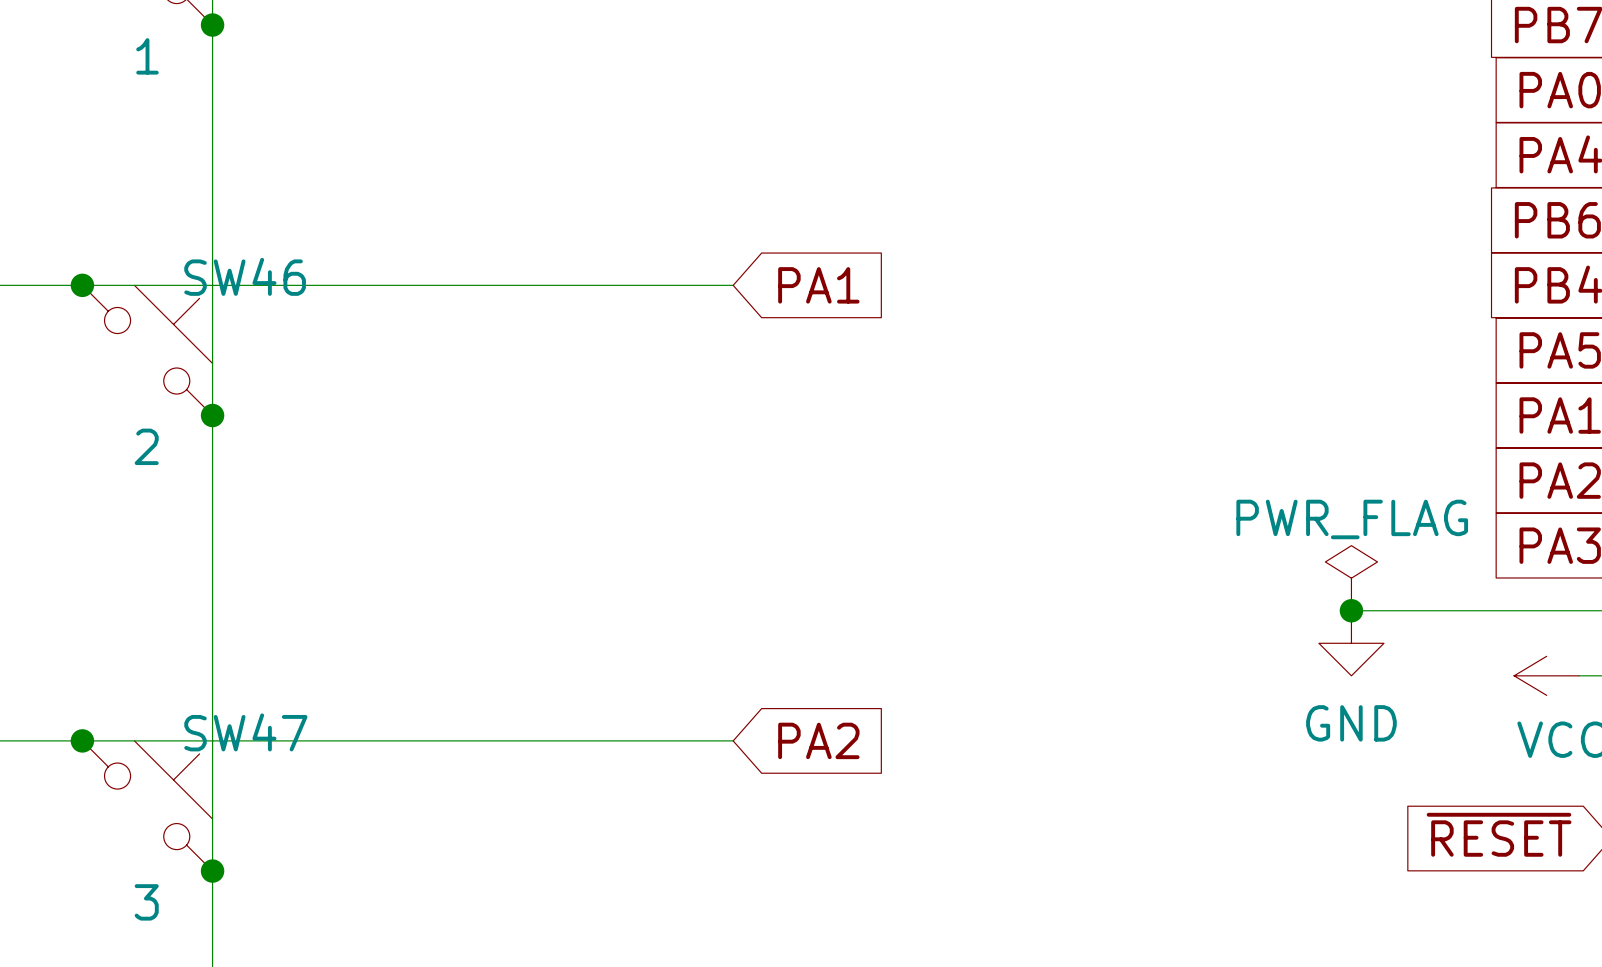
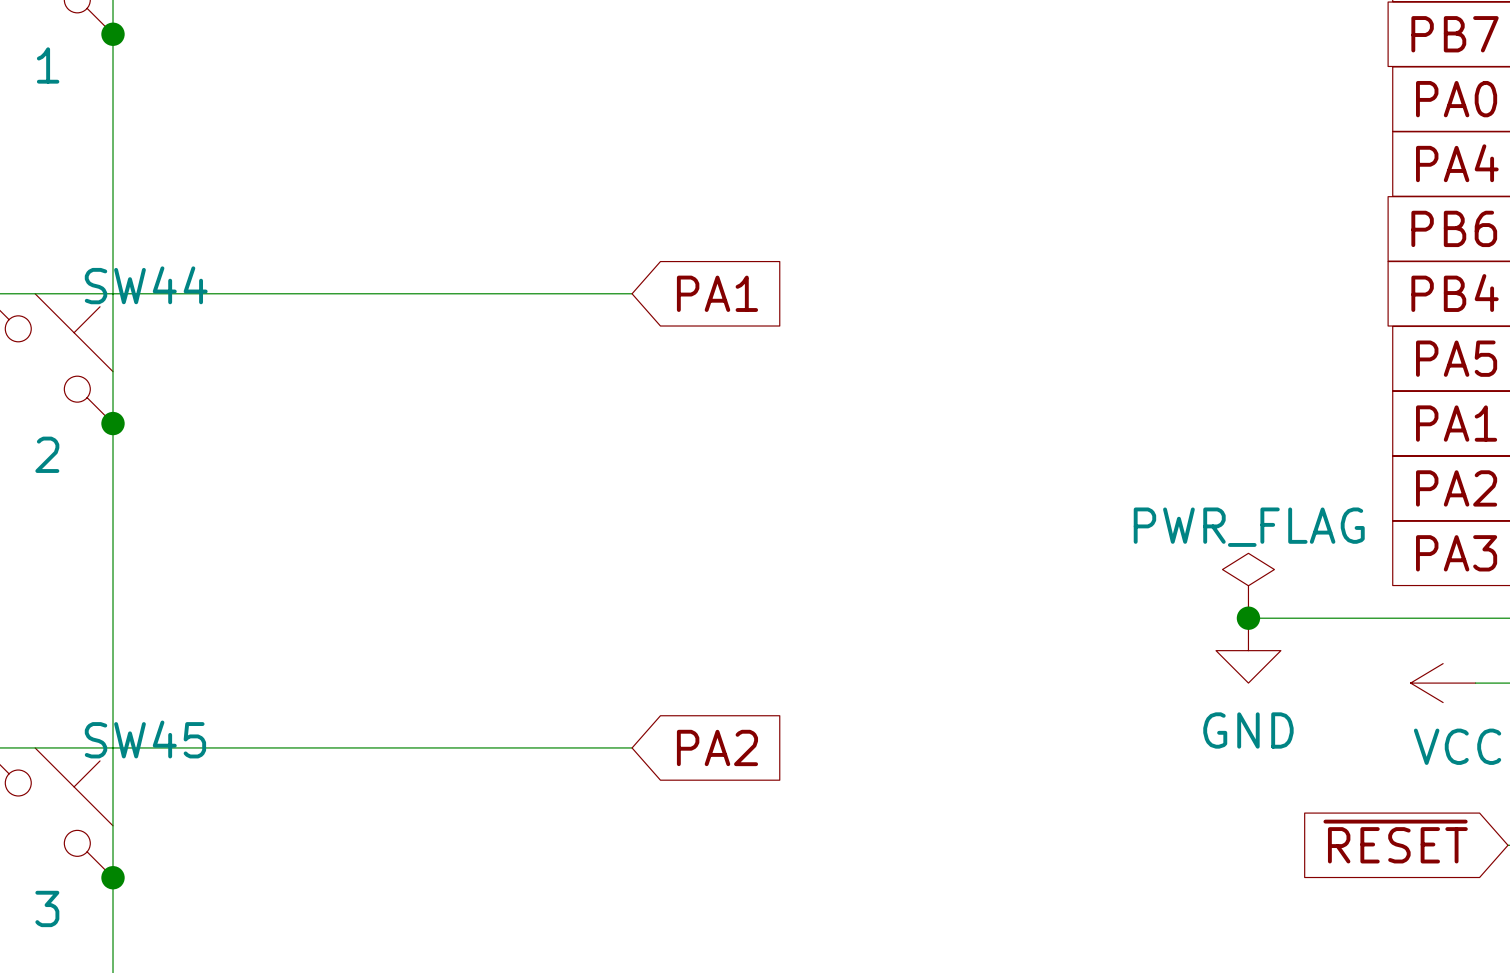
SW46 name: SW46 (245, 276) -> SW44 (146, 285)
SW47 name: SW47 (245, 732) -> SW45 (145, 739)

